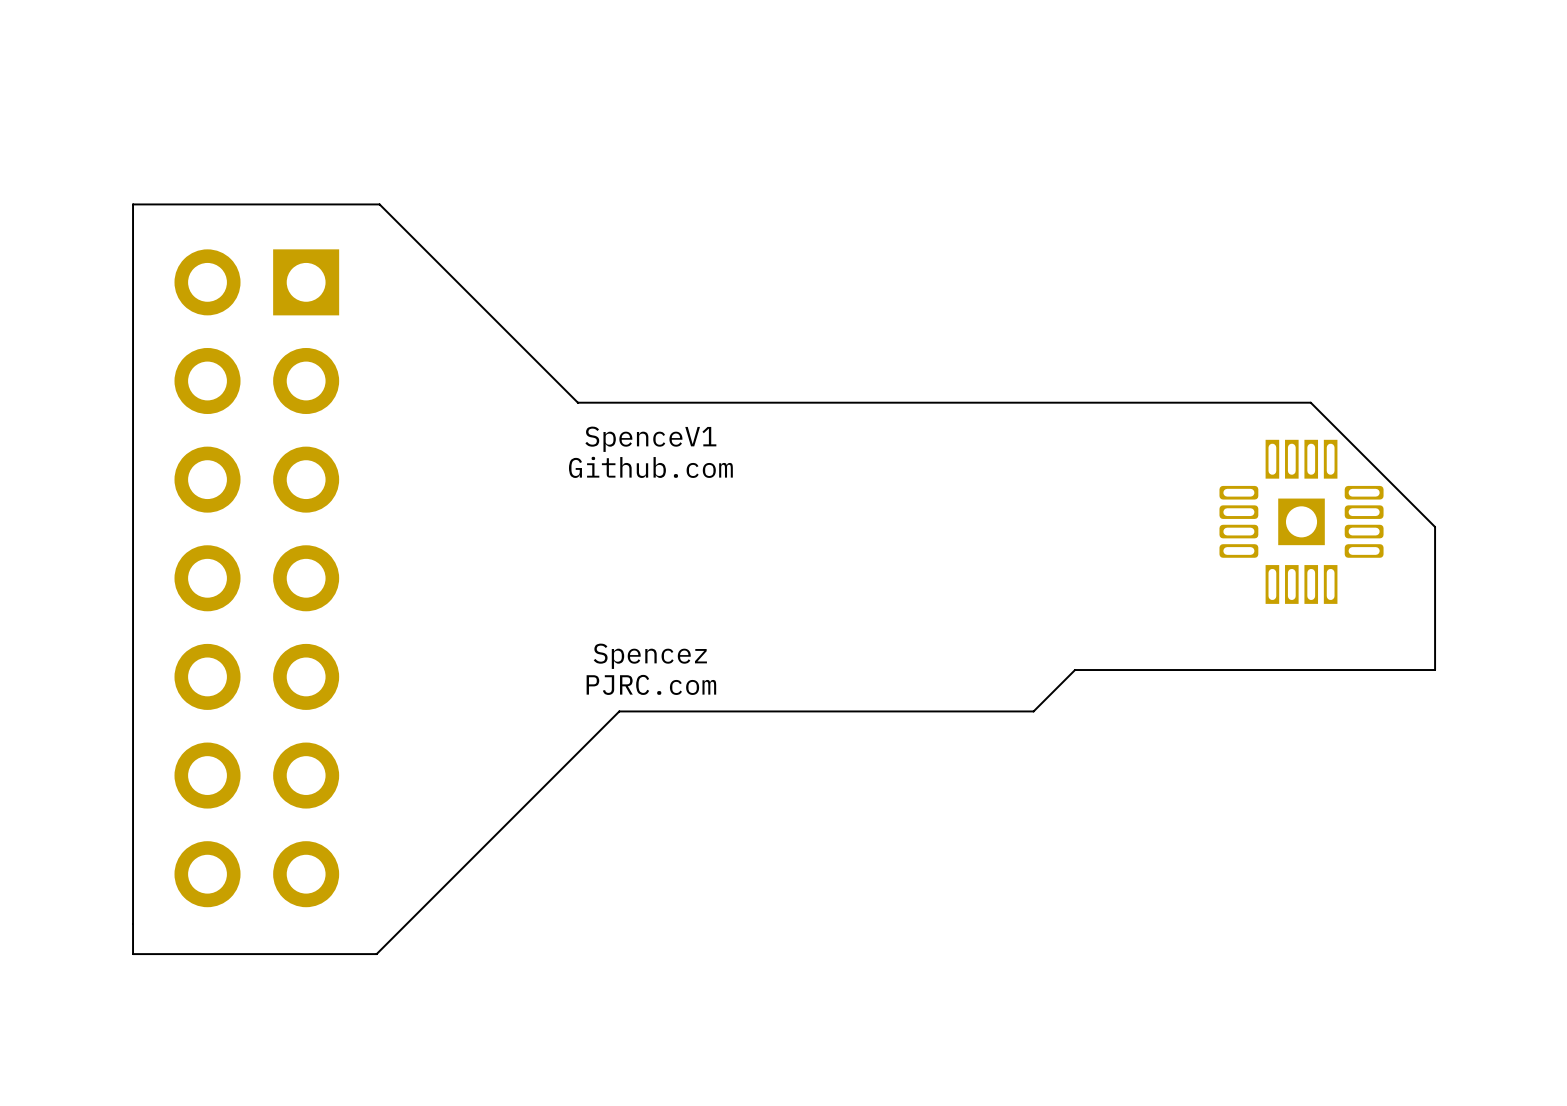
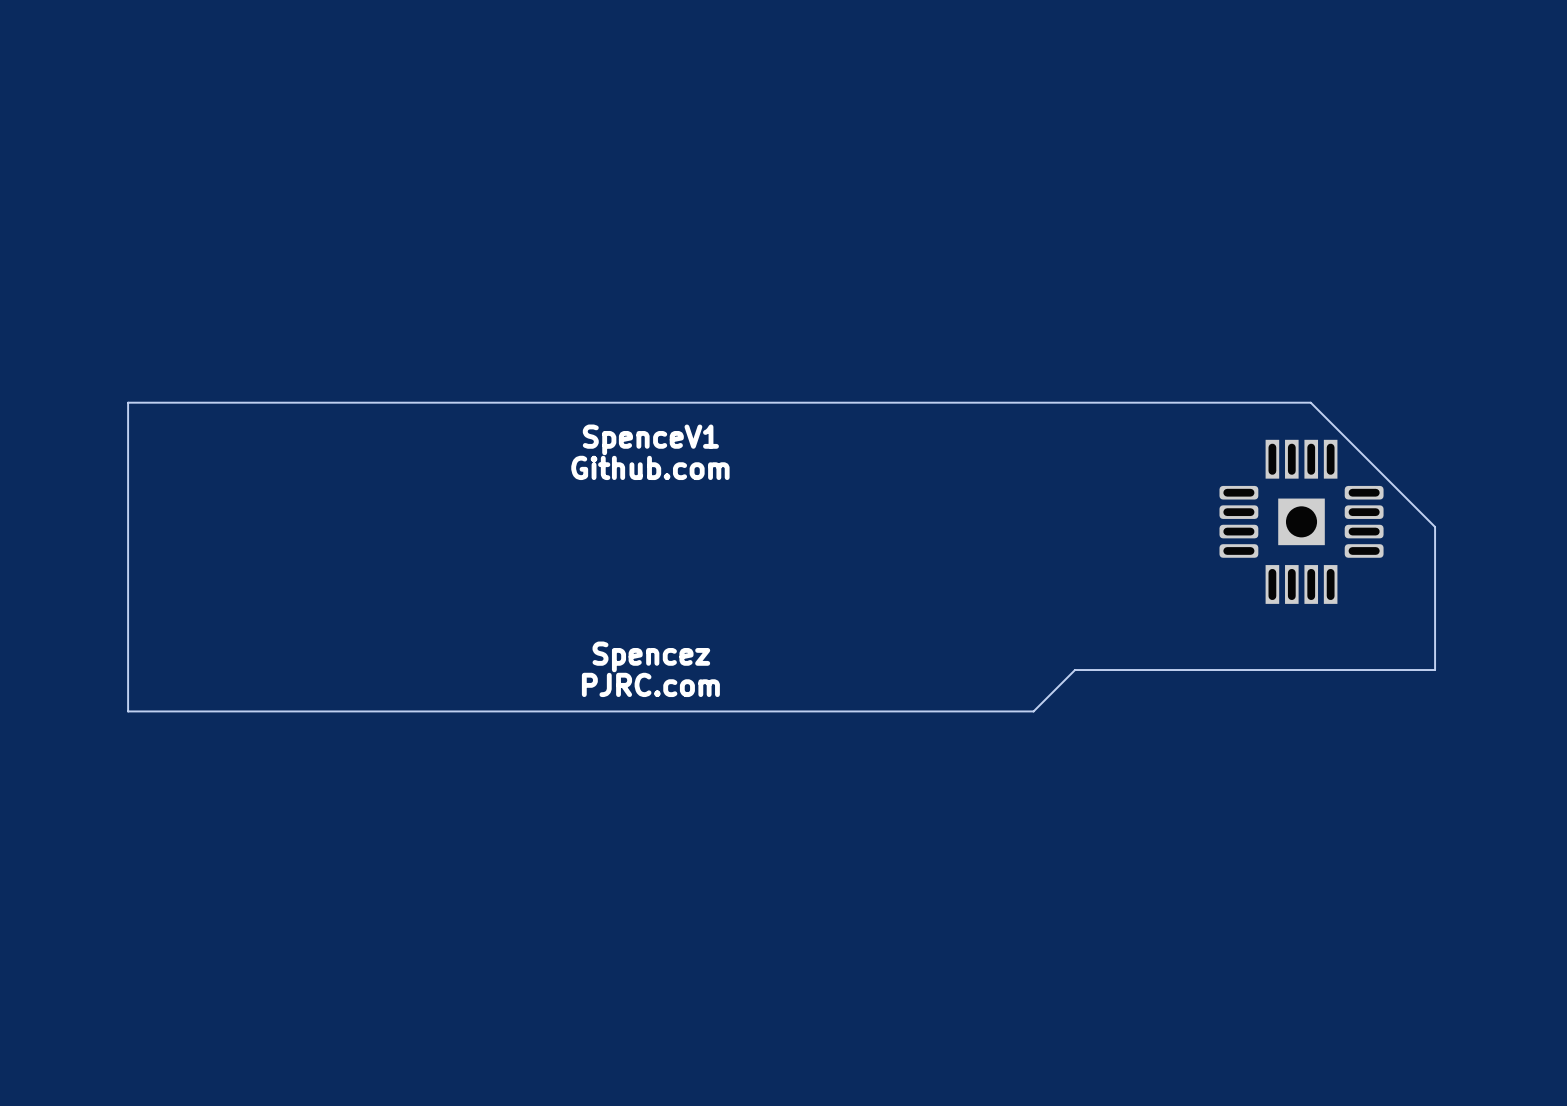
board edge: (577, 402) (379, 204) (133, 204) (133, 954) (376, 954) (619, 711) -> (577, 402) (128, 402) (128, 711) (619, 711)
part: (256, 578) -> none

